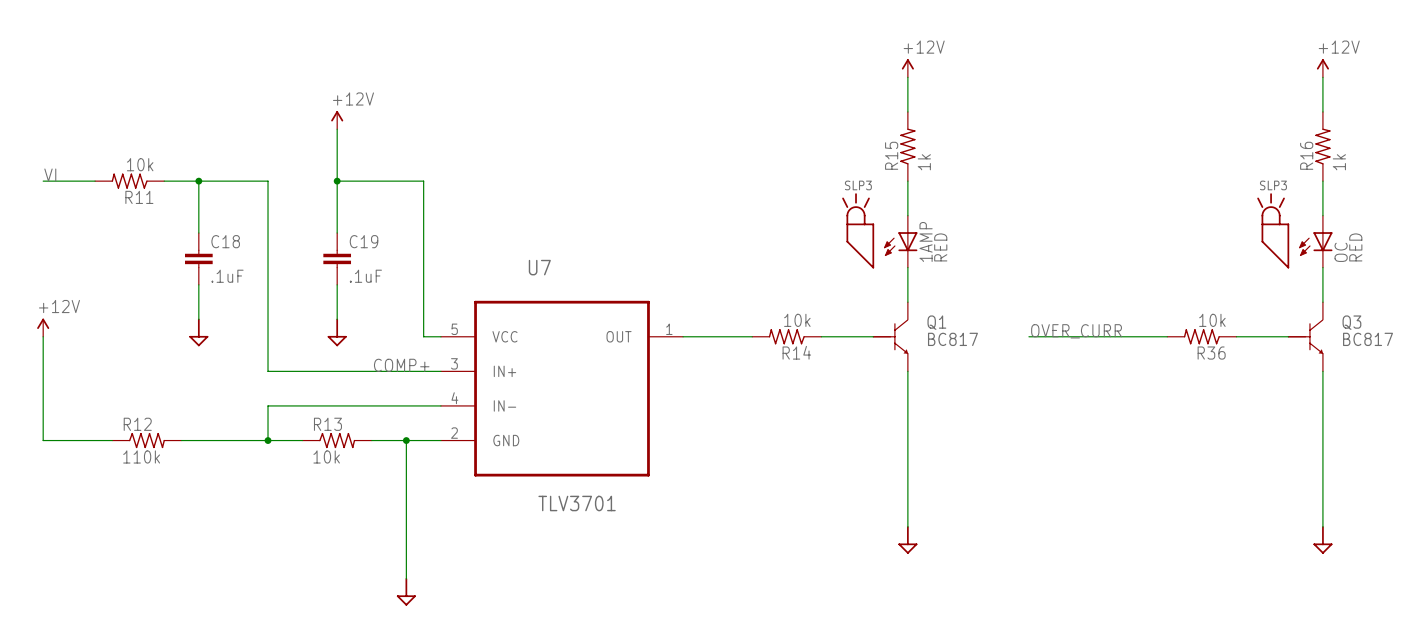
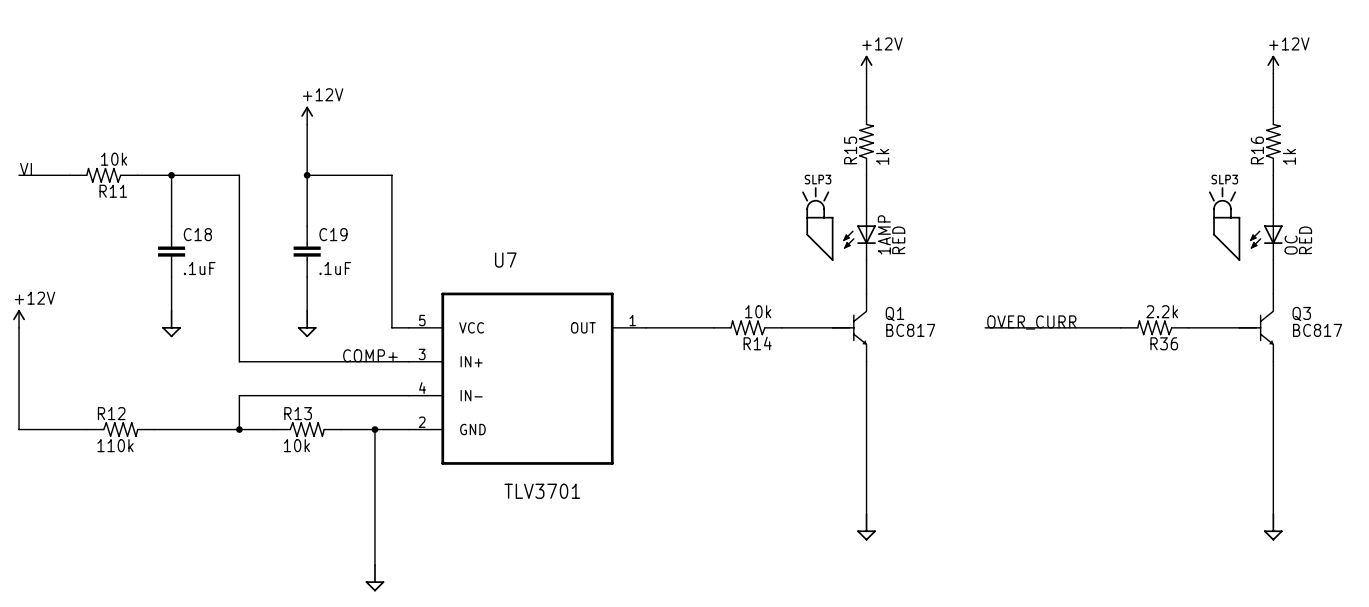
R36 value: 10k (1212, 320) -> 2.2k (1162, 311)

